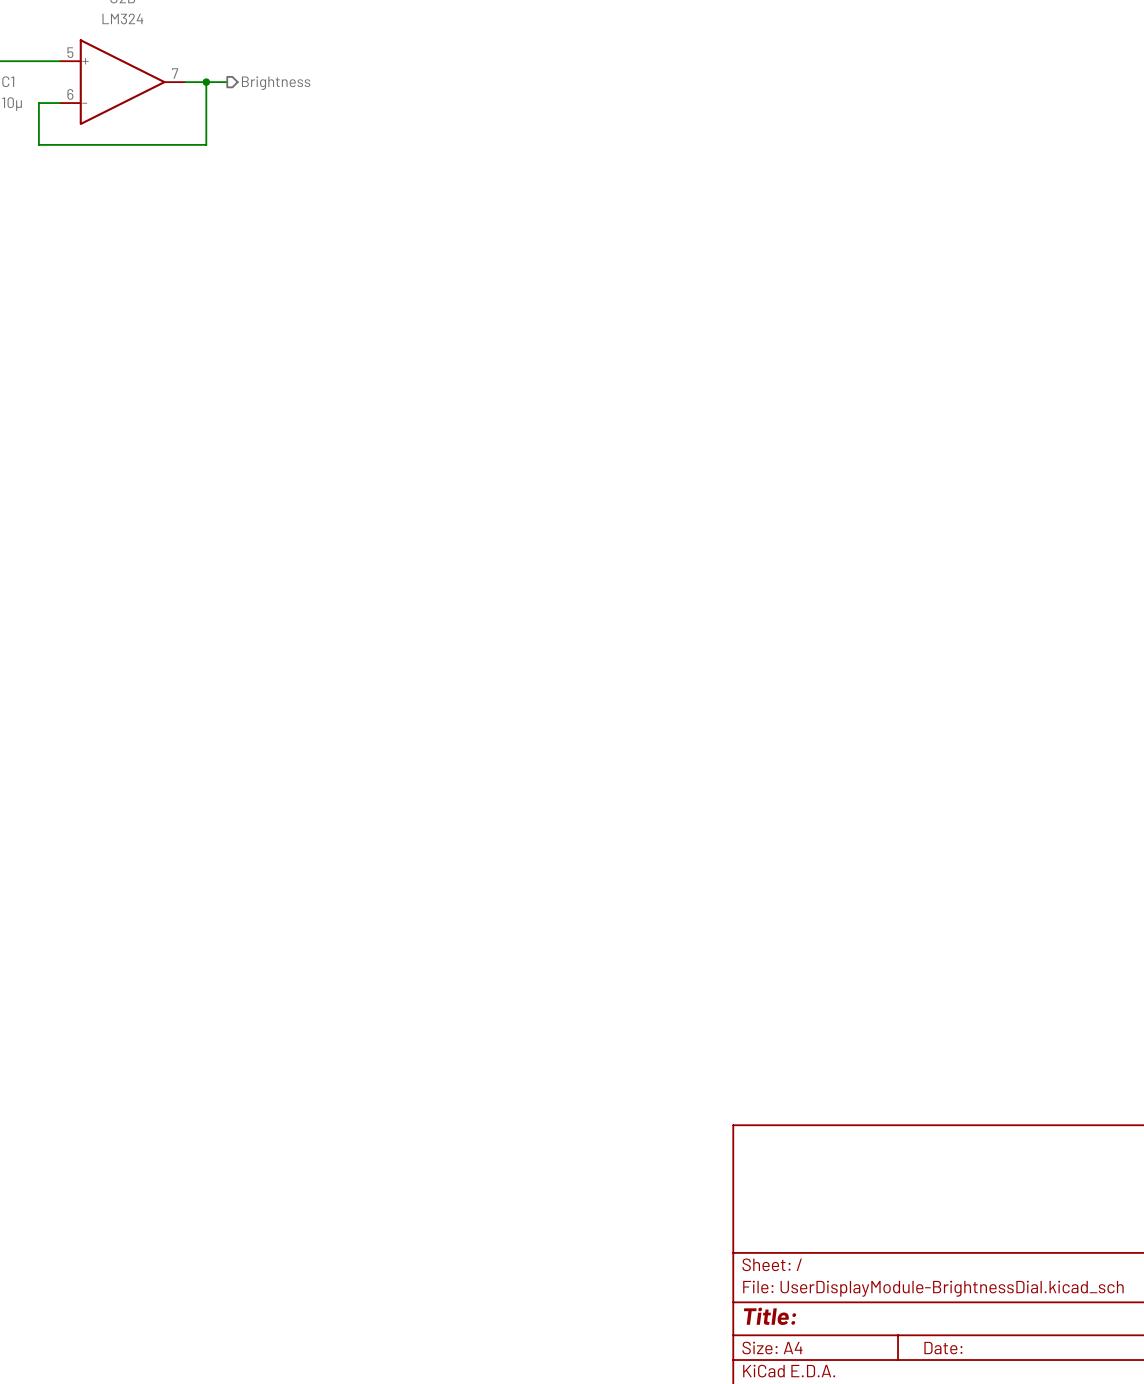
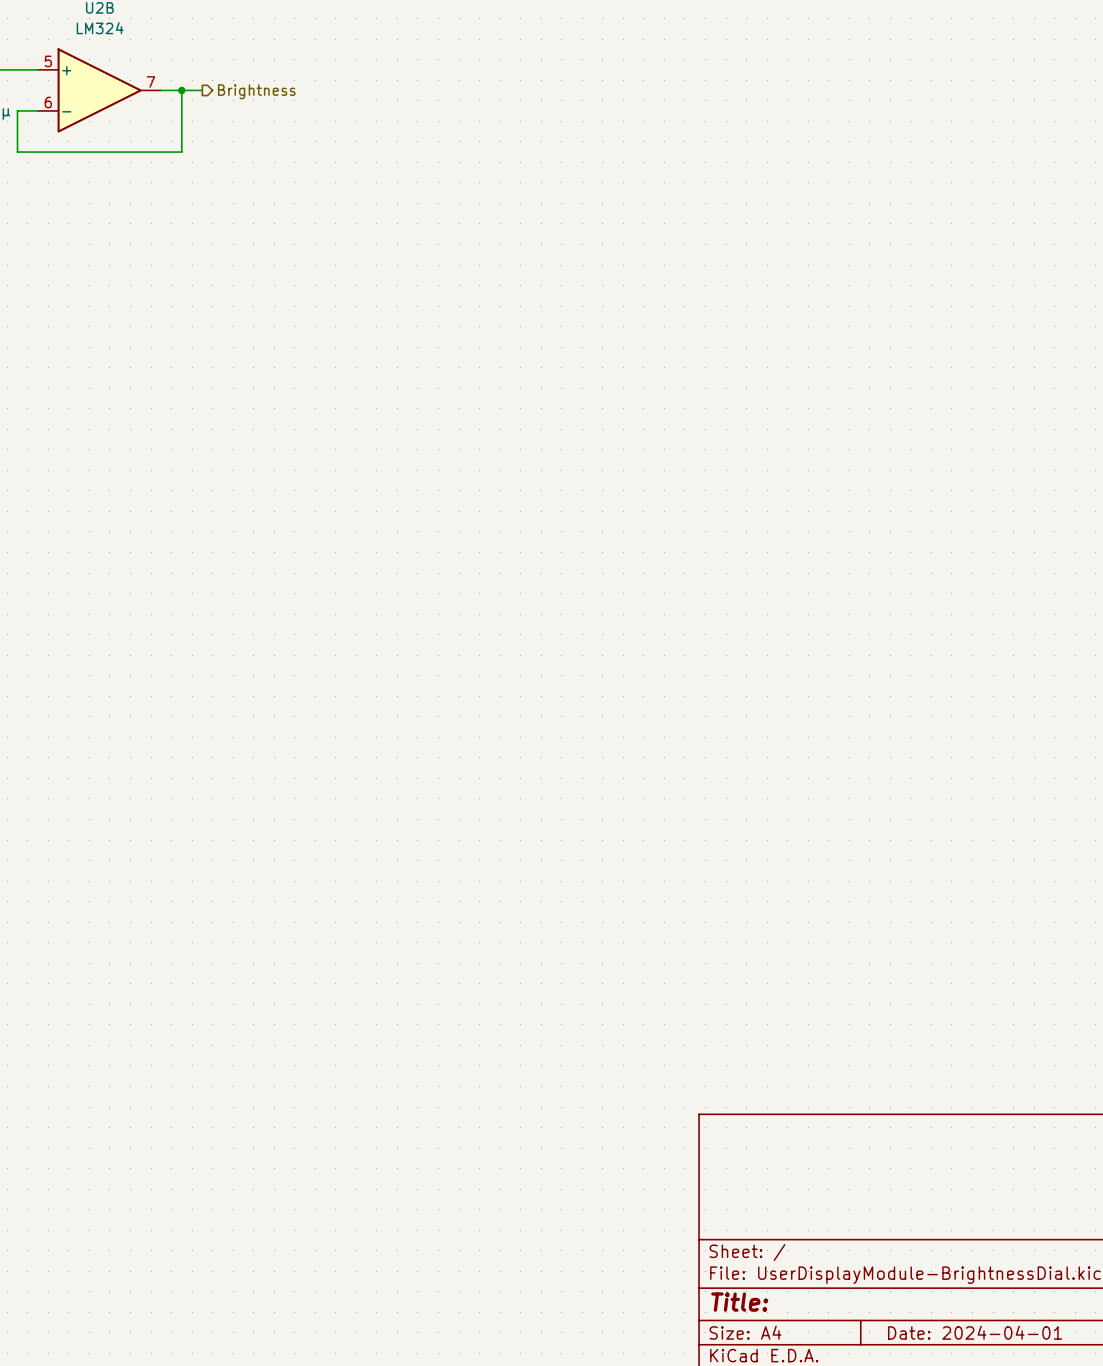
title block: Date: (943, 1348) -> Date: 2024-04-01 (975, 1332)

